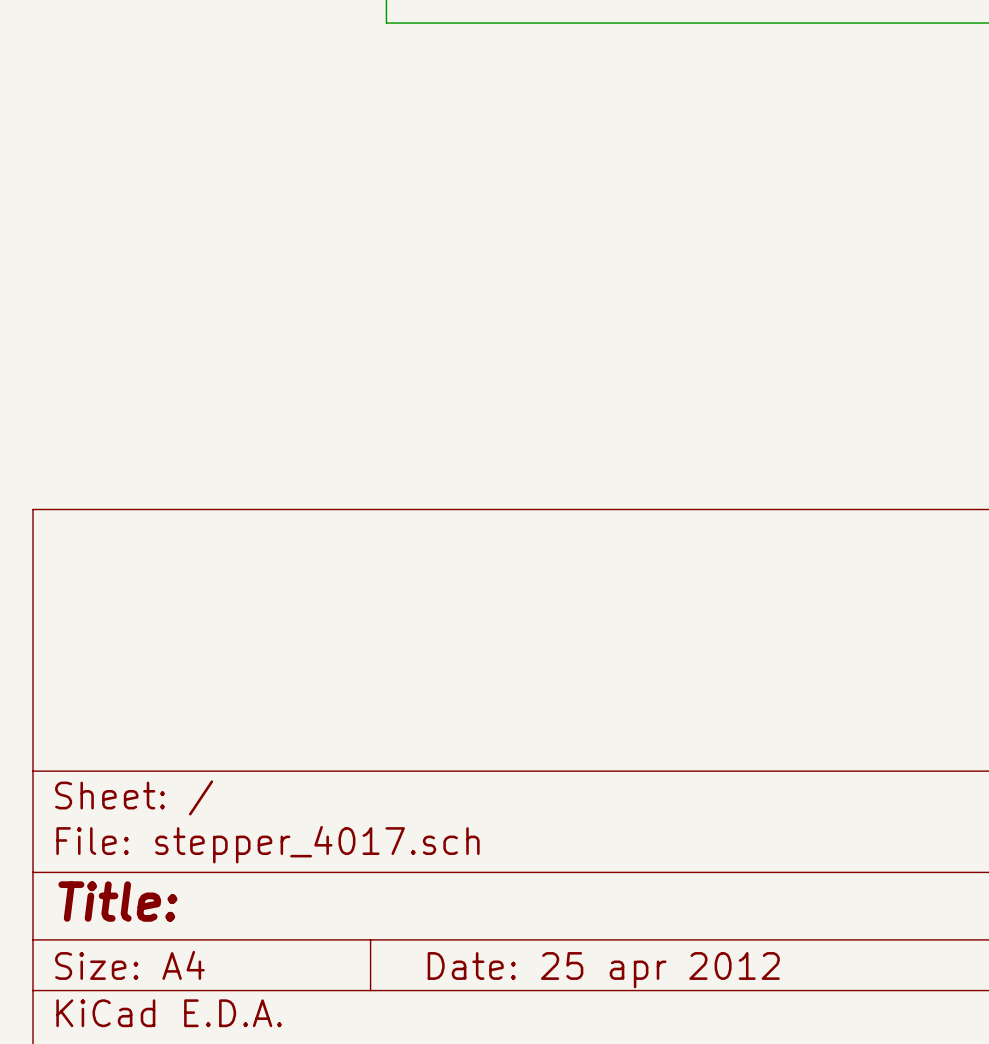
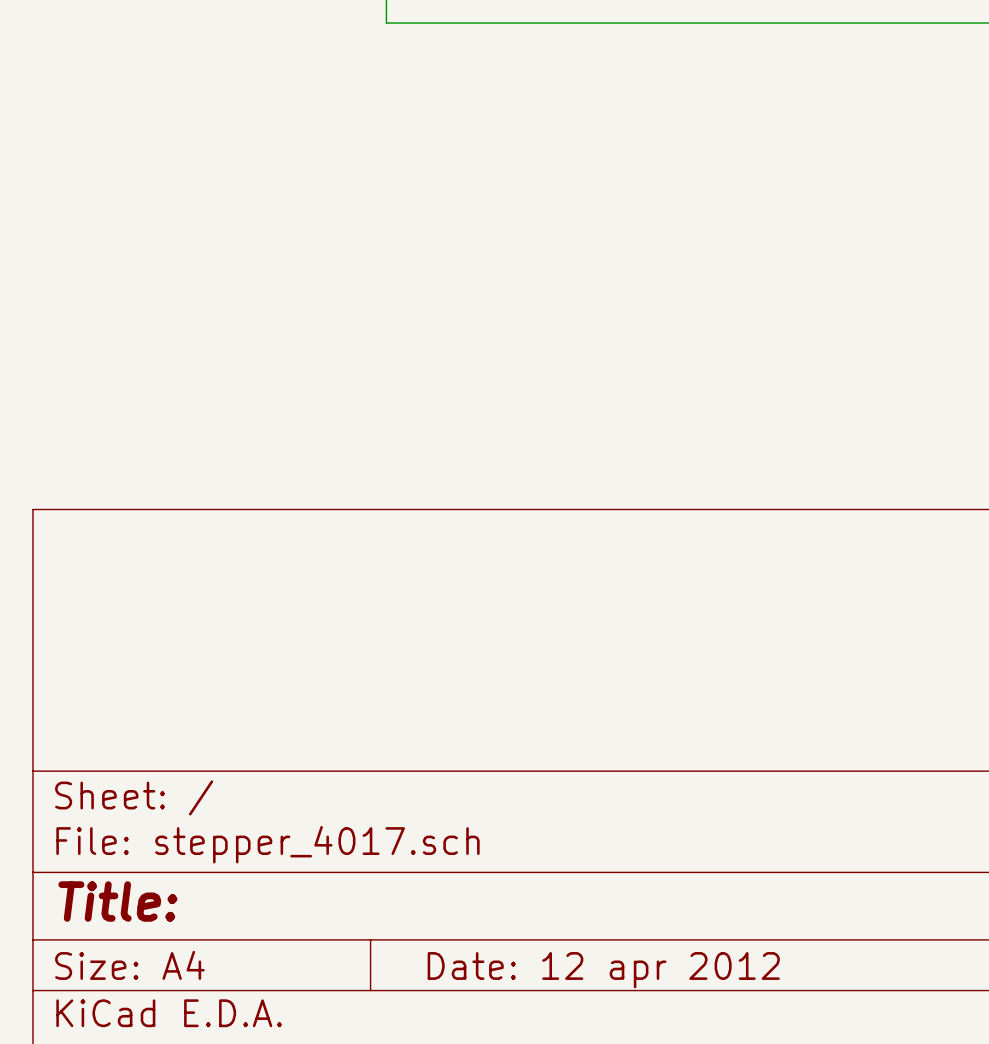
title block: Date: 25 apr 2012 (603, 970) -> Date: 12 apr 2012 (603, 970)

